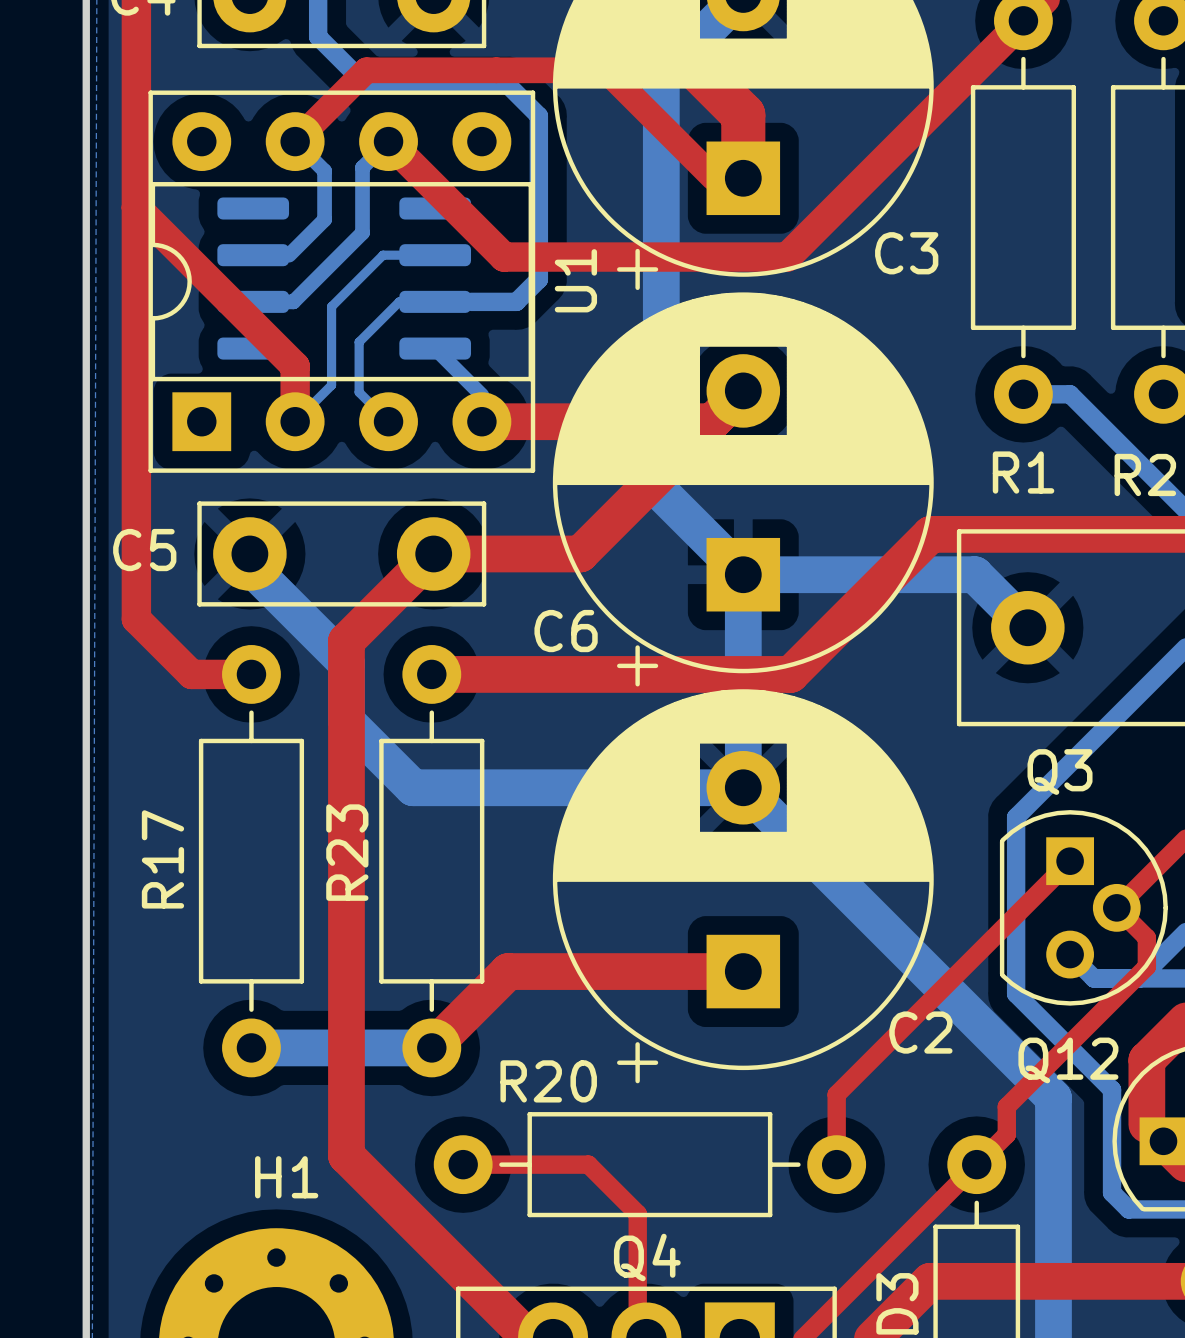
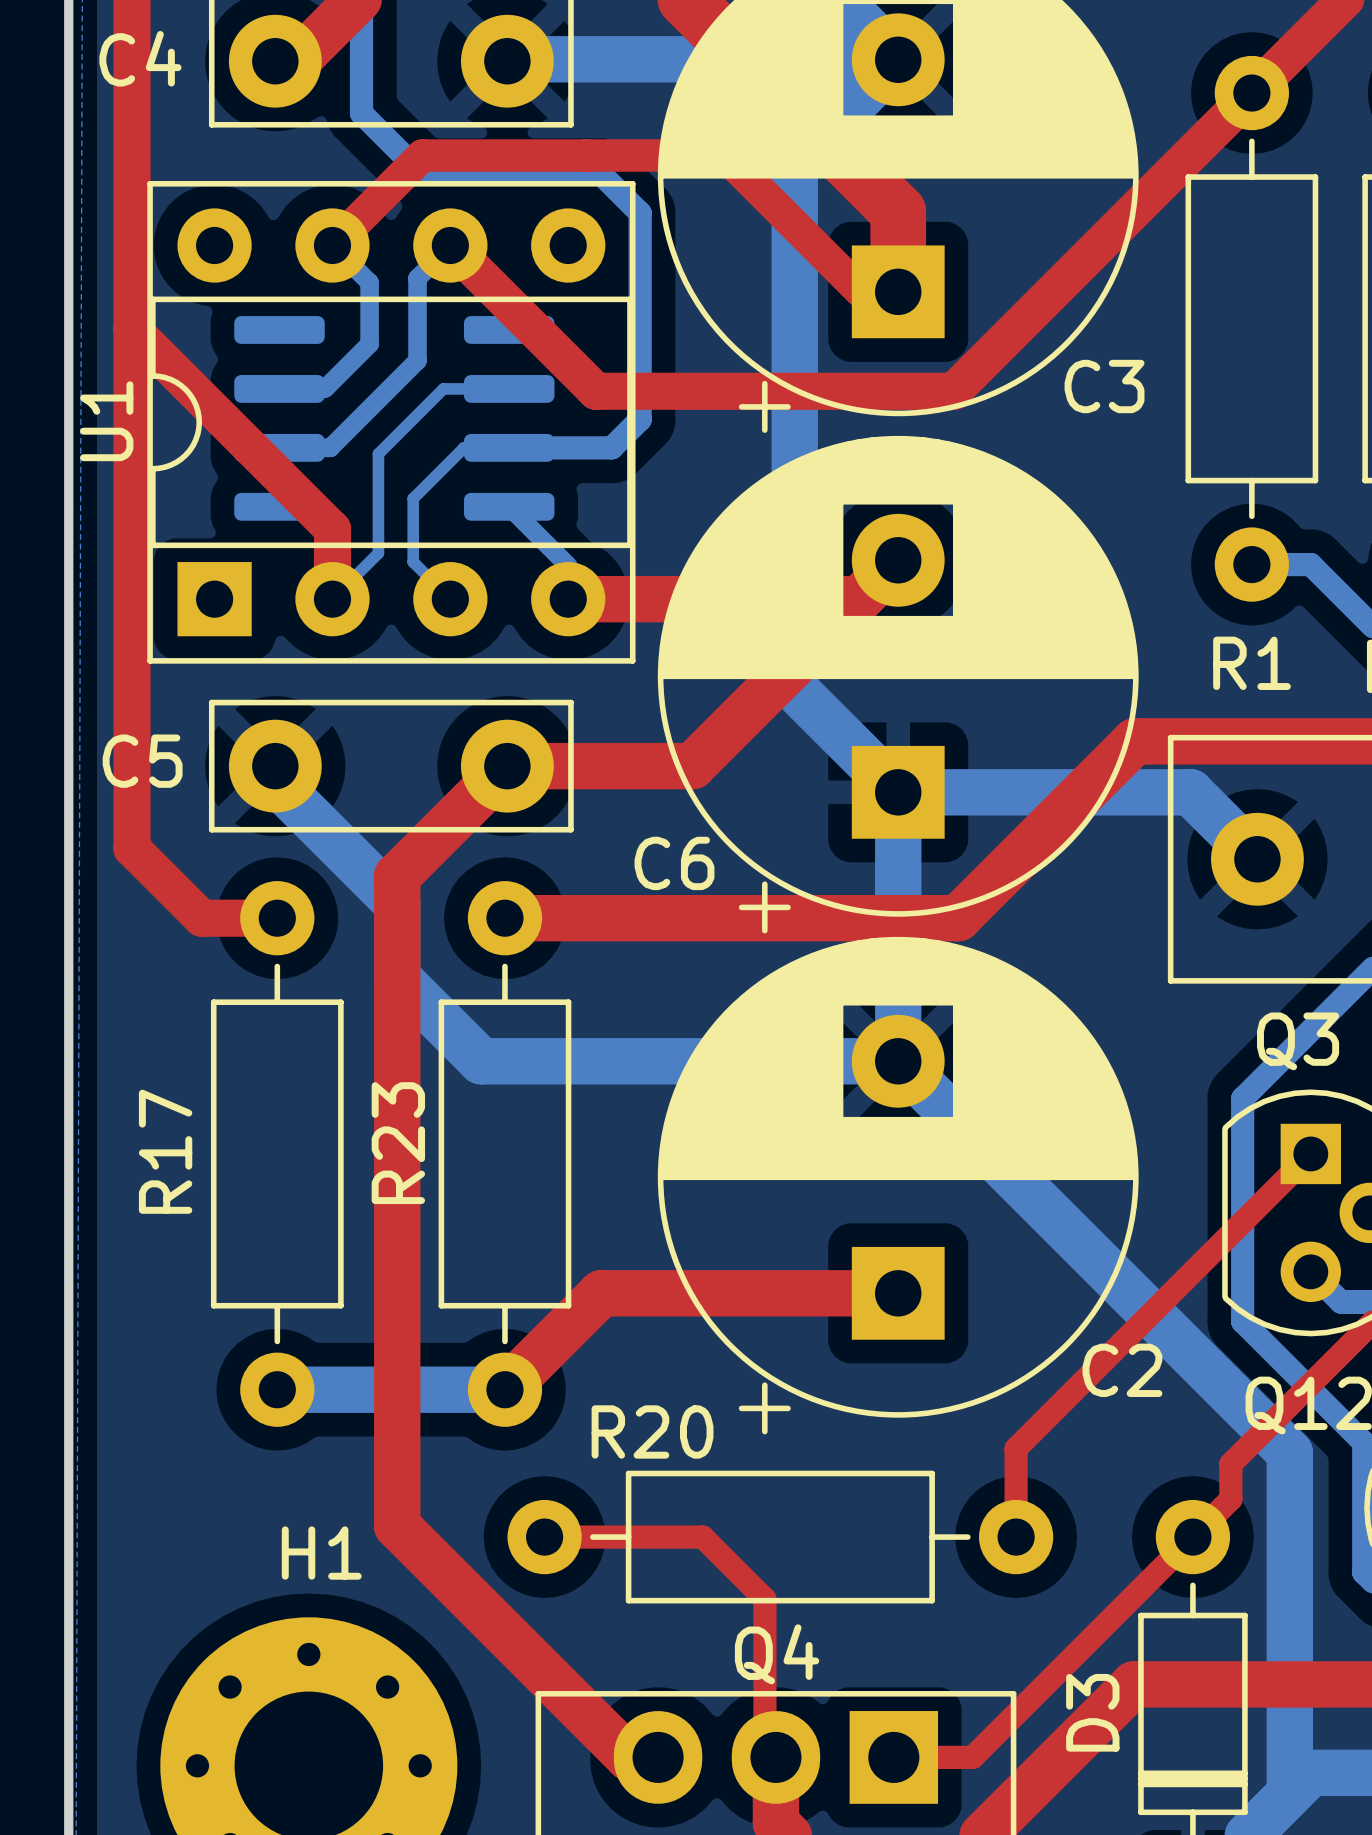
U1 name position: U1 (575, 280) -> U1 (106, 421)

